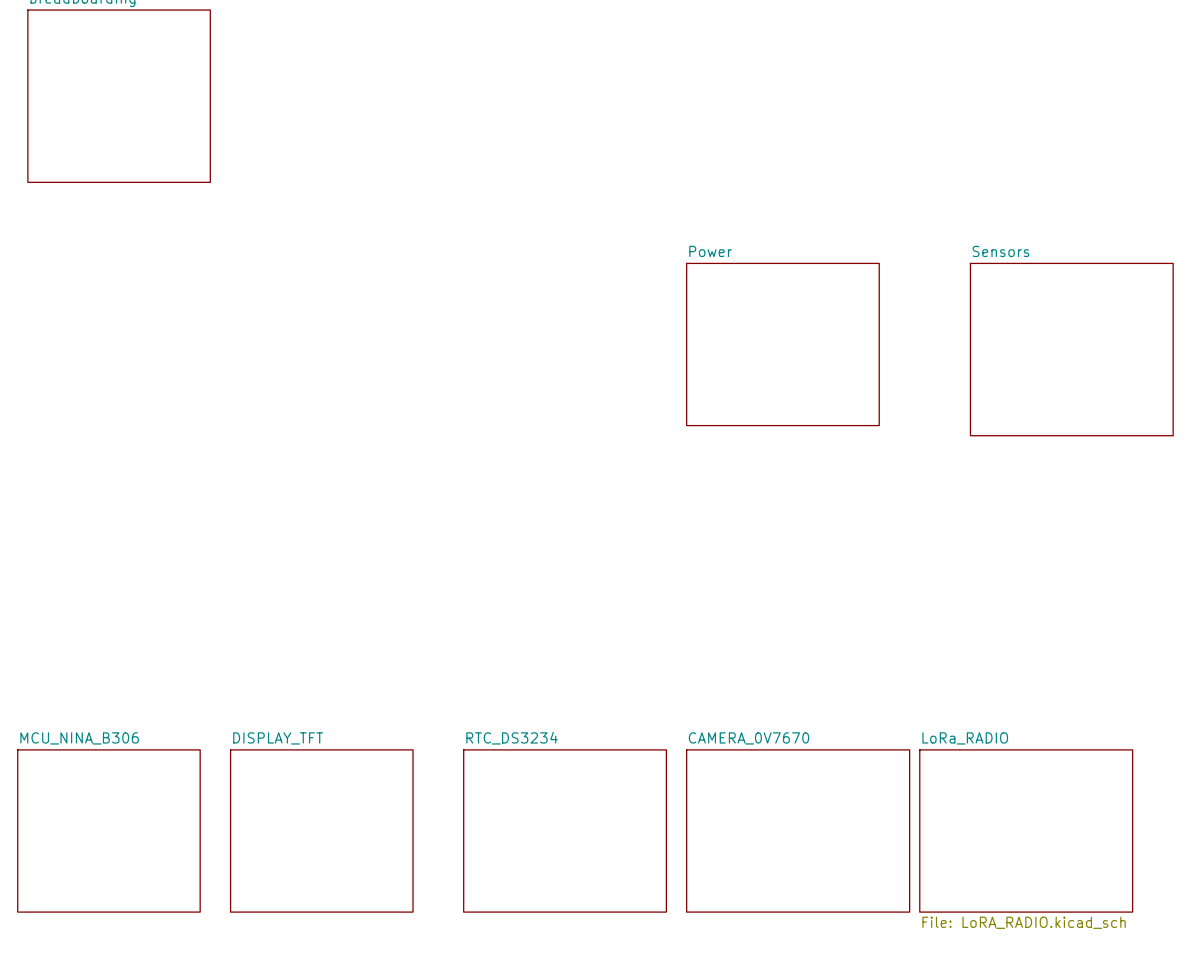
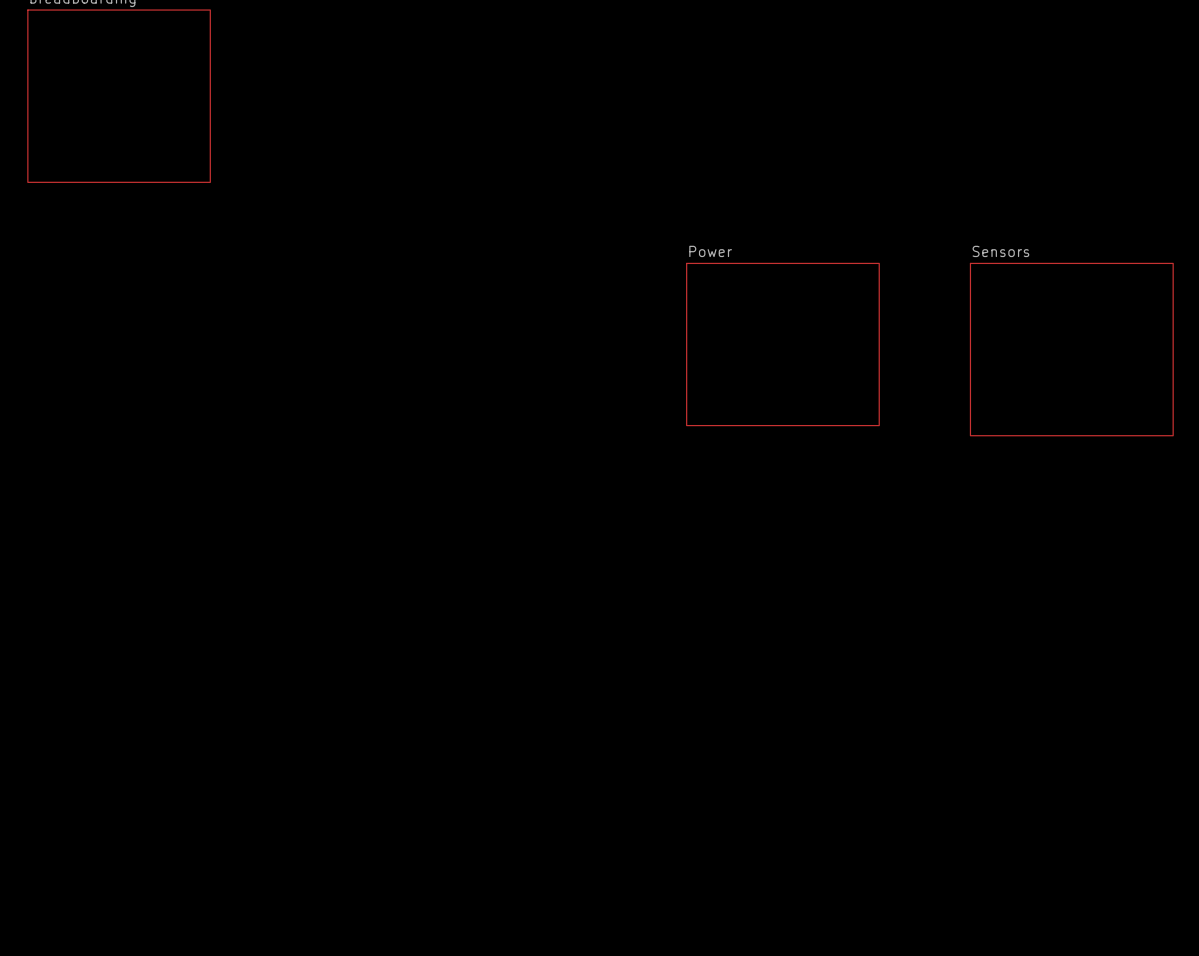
sheet MCU_NINA_B306: (108, 831) -> none
sheet DISPLAY_TFT: (321, 831) -> none
sheet RTC_DS3234: (565, 831) -> none
sheet CAMERA_0V7670: (798, 831) -> none
sheet LoRa_RADIO: File: LoRA_RADIO.kicad_sch (1026, 831) -> none

